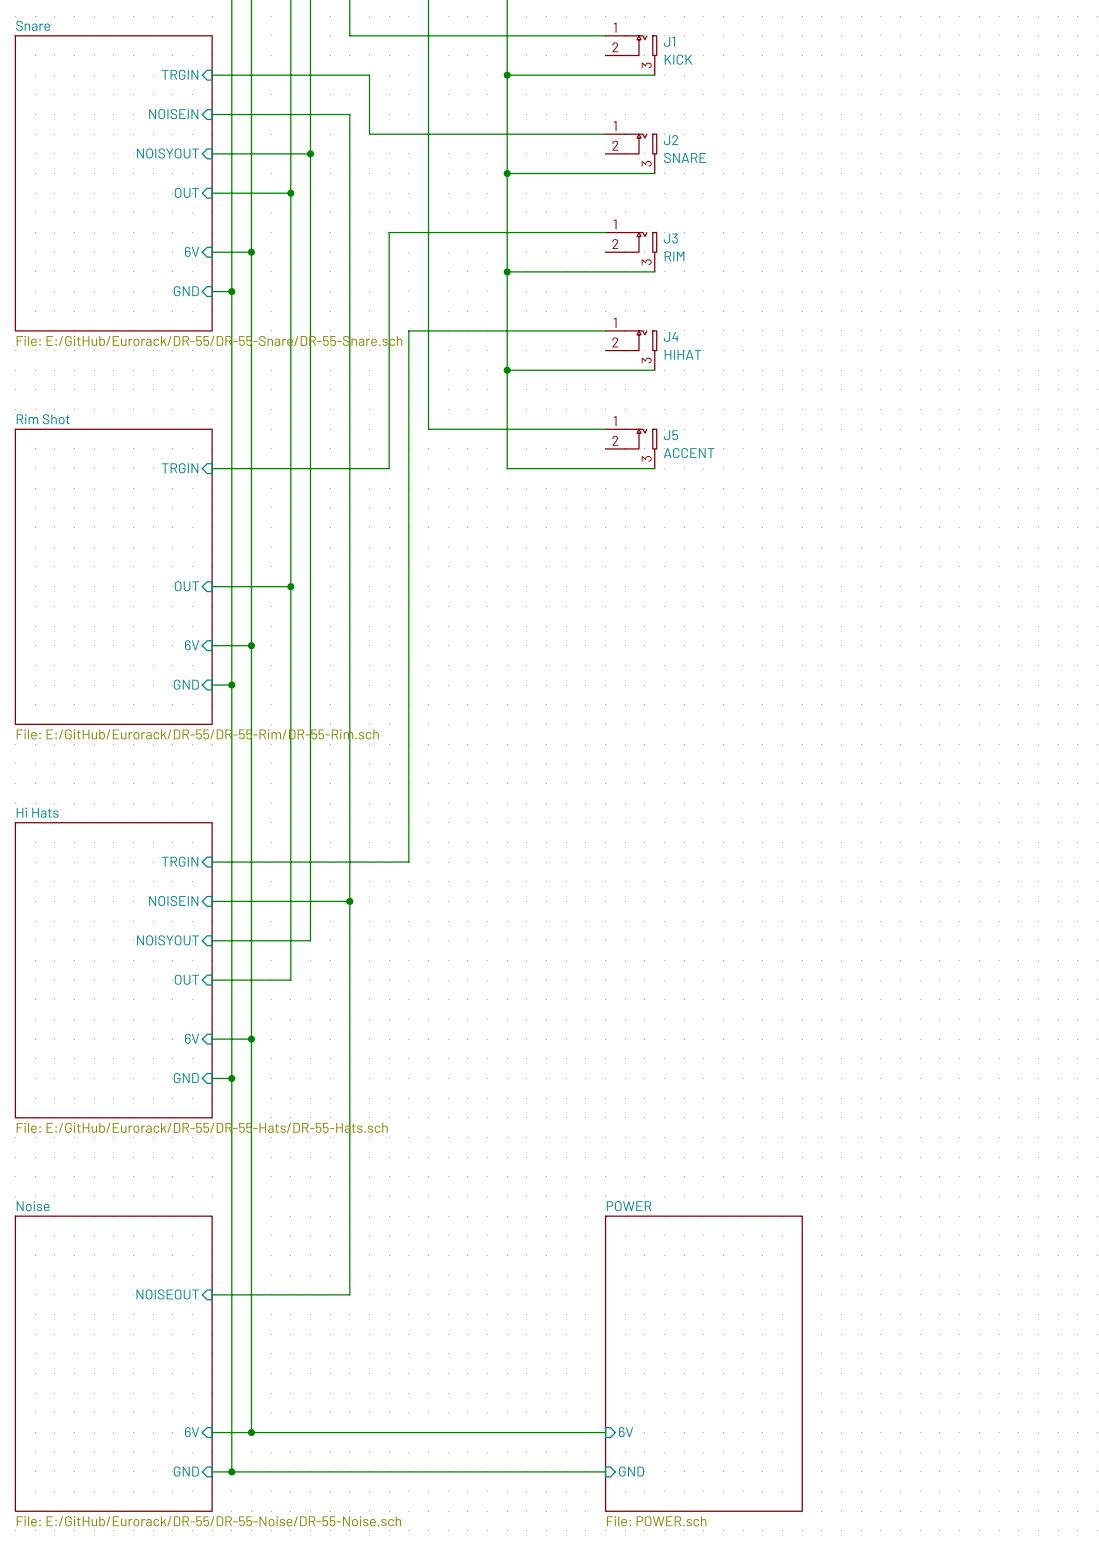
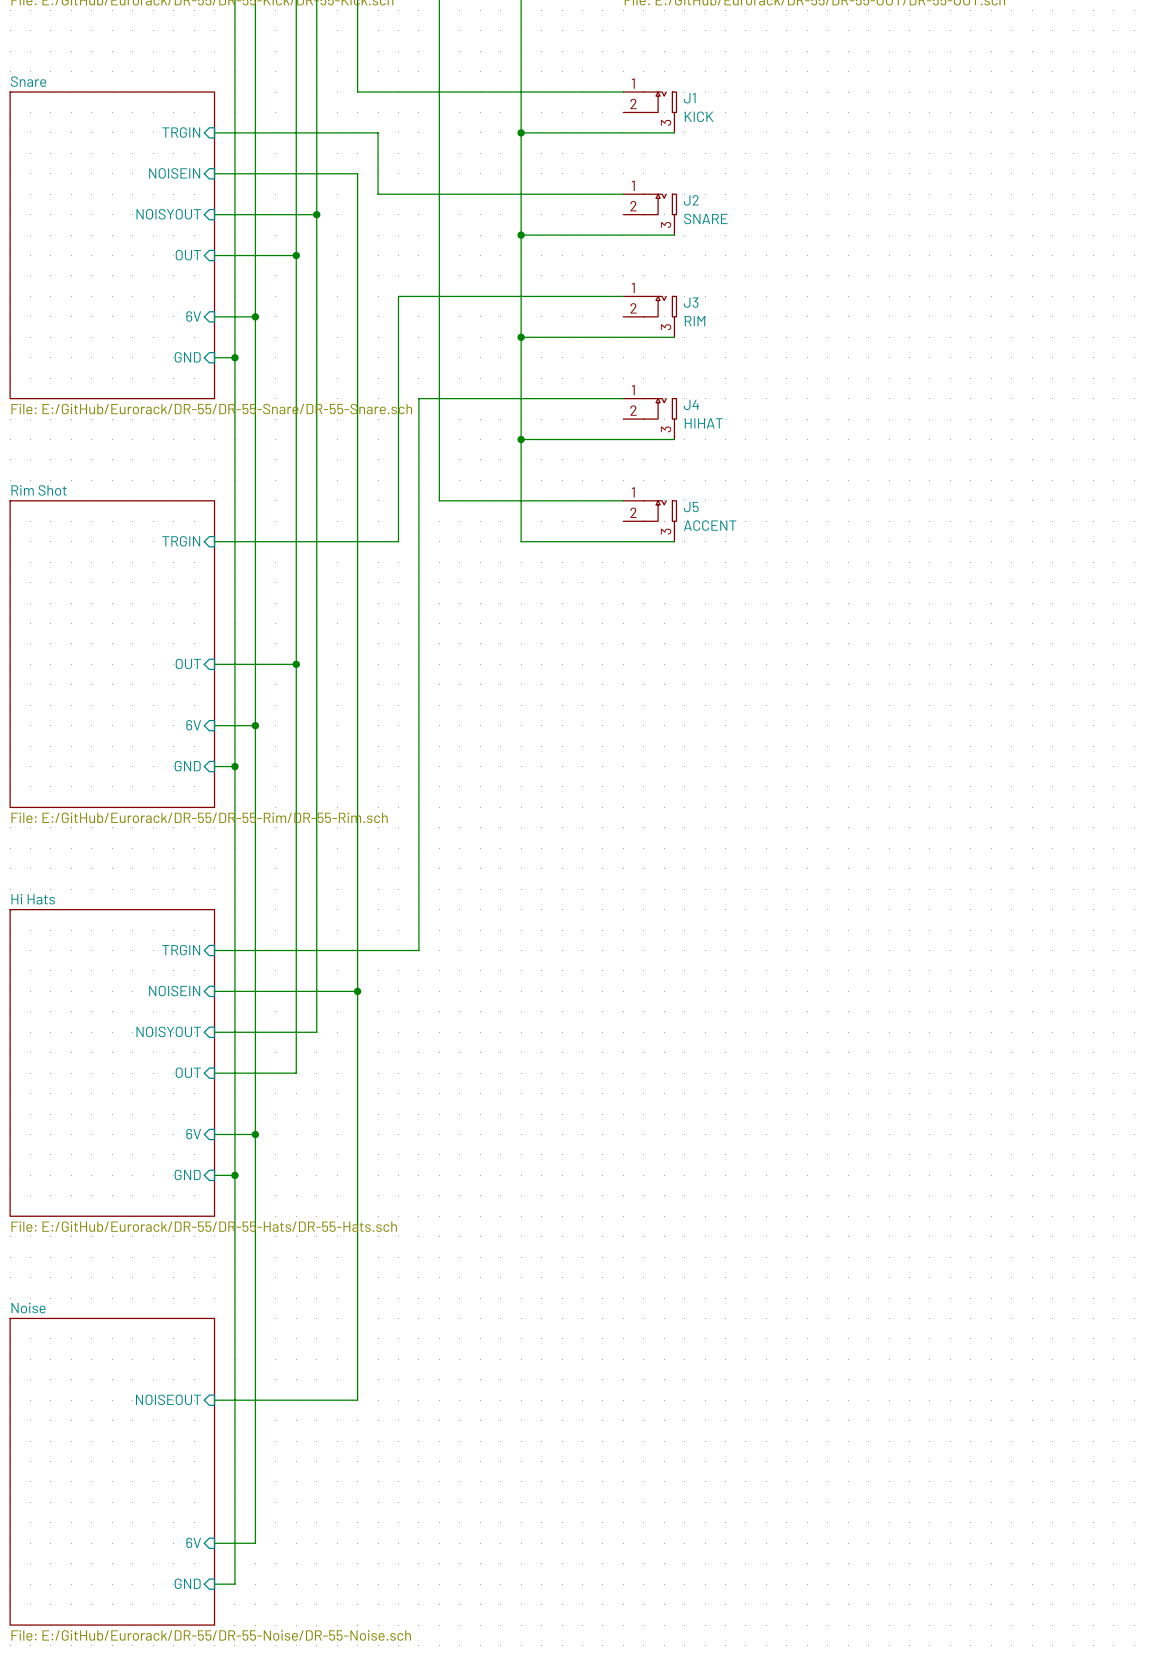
sheet POWER: File: POWER.sch (703, 1363) -> none
wire: (251, 1432) (605, 1432) -> none
junction: (251, 1432) -> none
sheet pin: 6V (626, 1432) -> none
wire: (231, 1471) (605, 1471) -> none
junction: (231, 1471) -> none
sheet pin: GND (631, 1471) -> none

